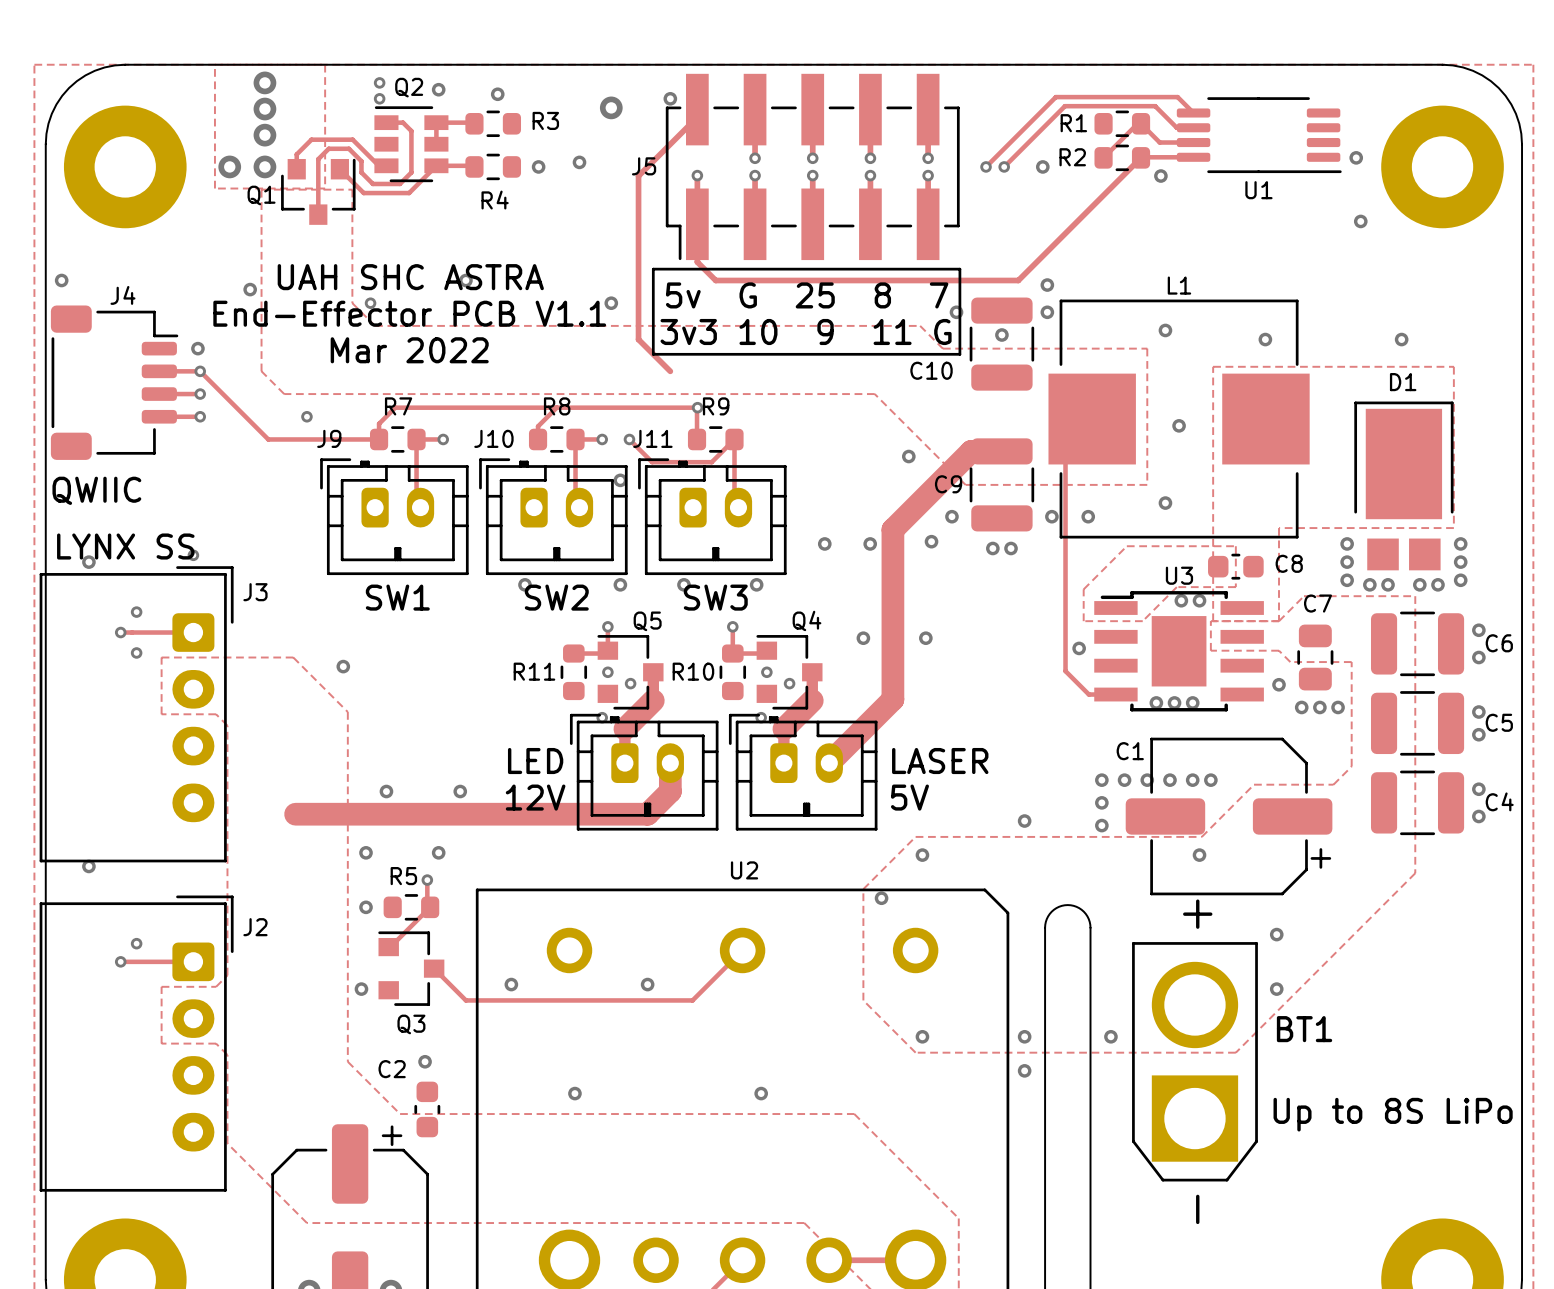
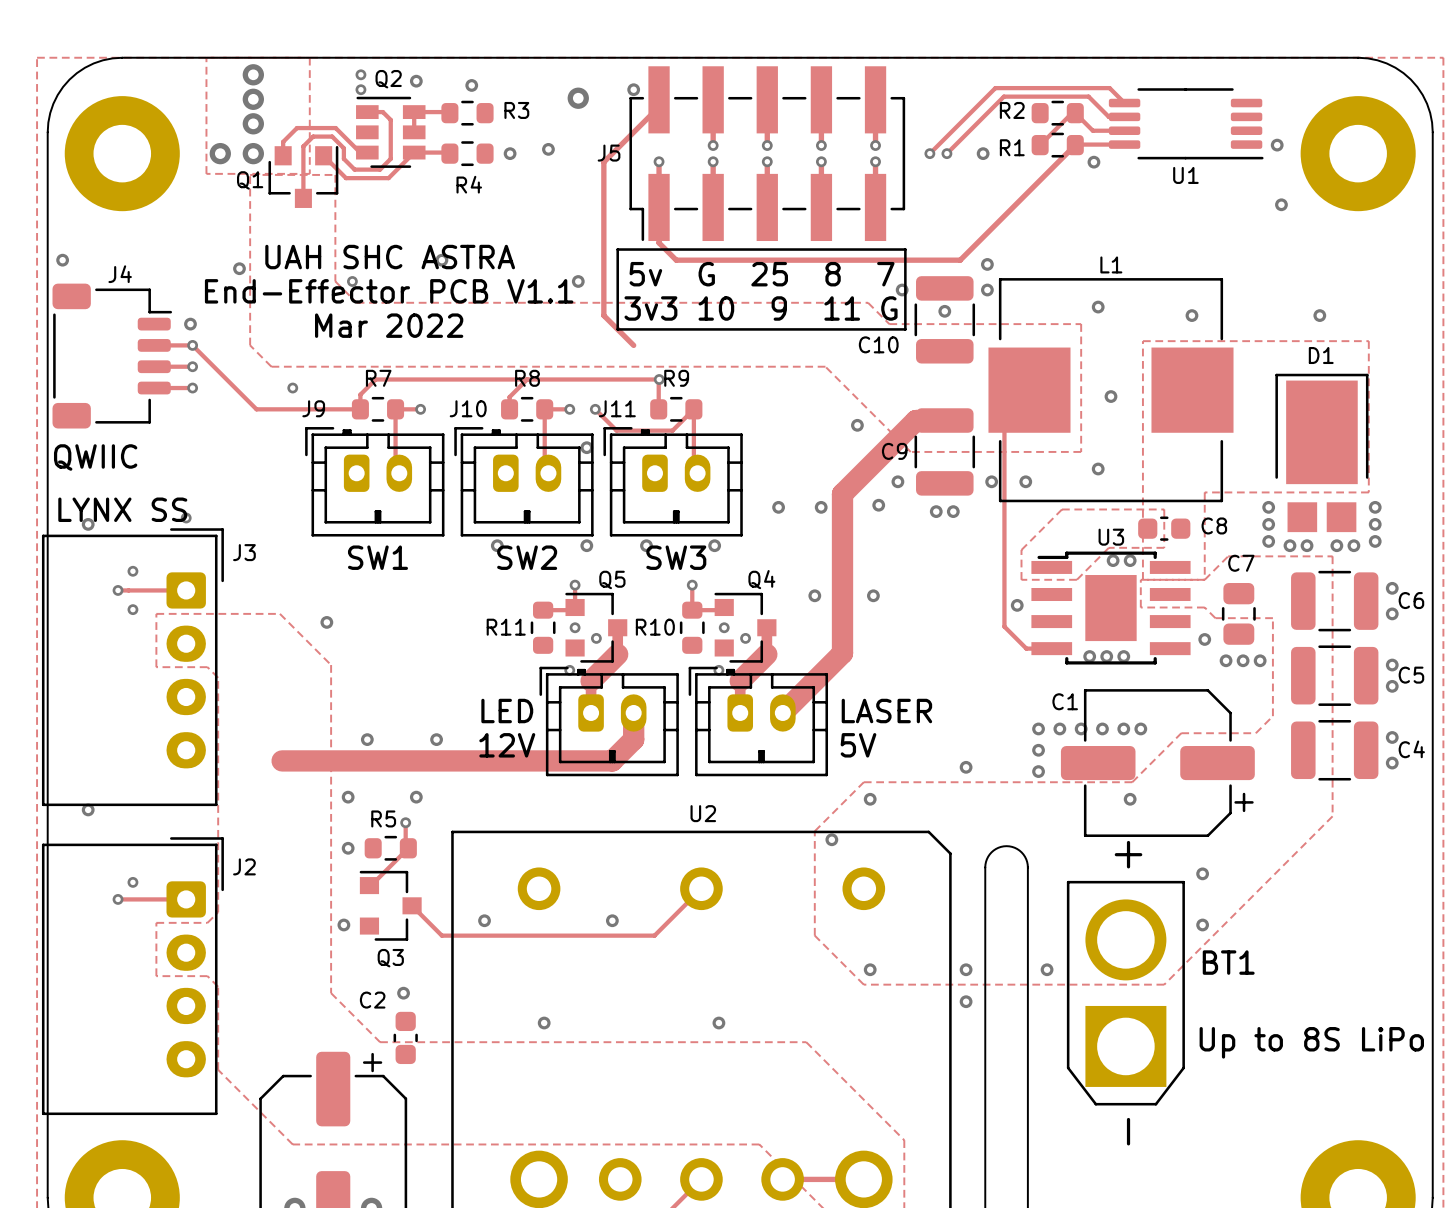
R1 name position: R1 (1073, 123) -> R1 (1012, 147)
R2 name position: R2 (1072, 157) -> R2 (1012, 110)

